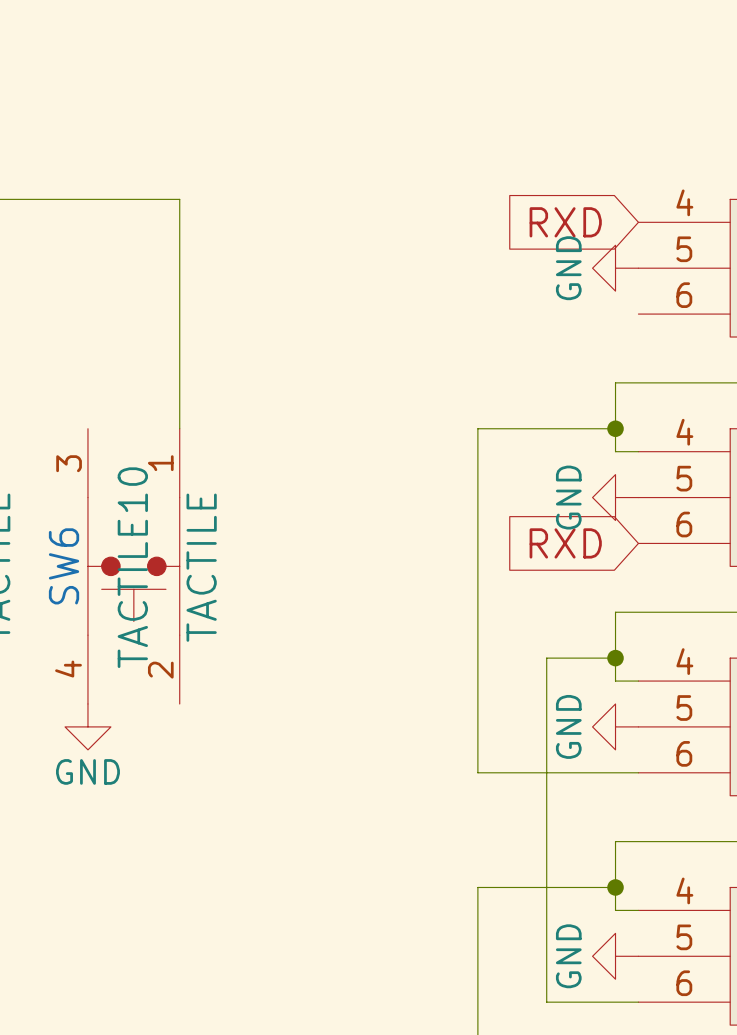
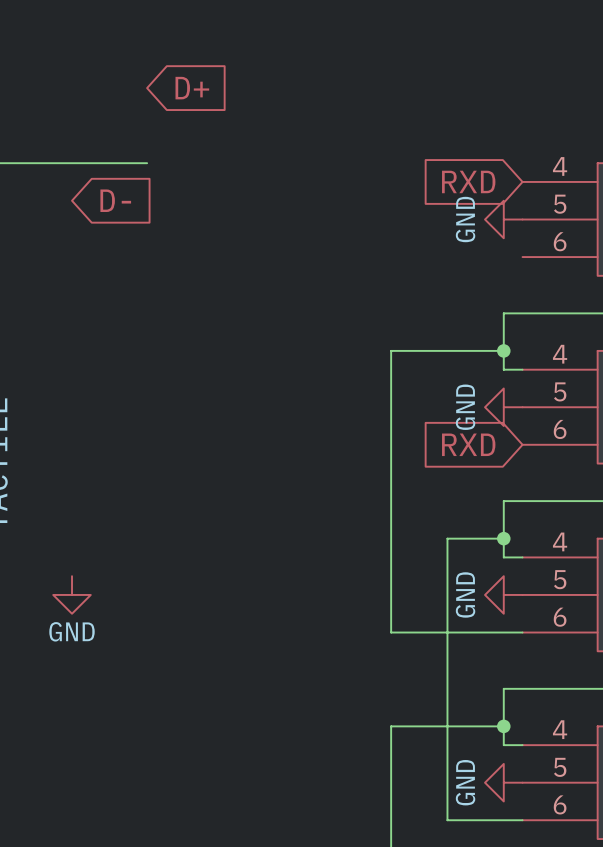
global label: none -> D+ (192, 88)
wire: (179, 199) (179, 428) -> none
global label: none -> D- (115, 200)
SW6: TACTILE (133, 566) -> none

